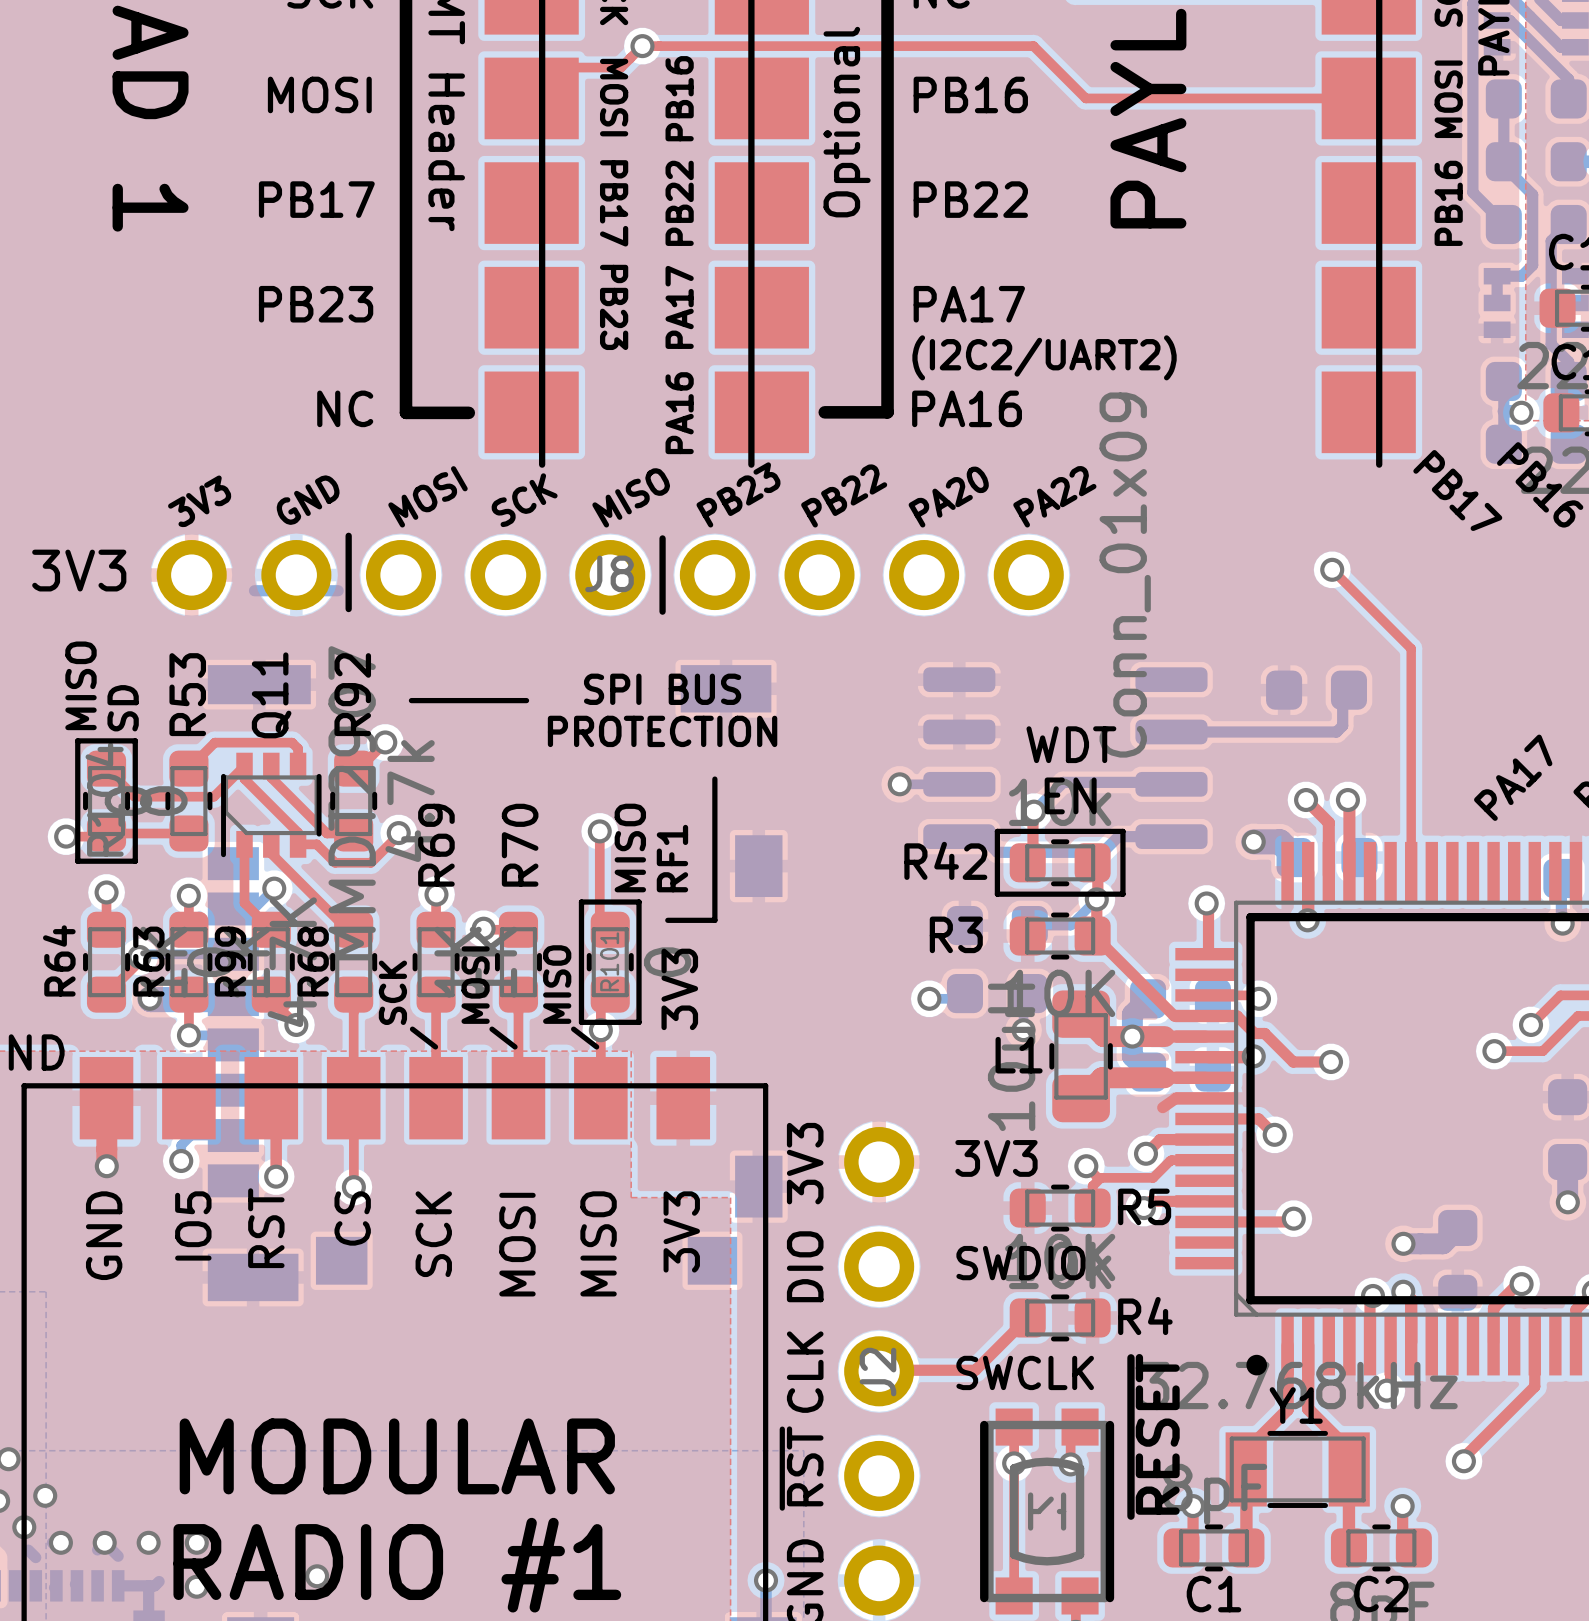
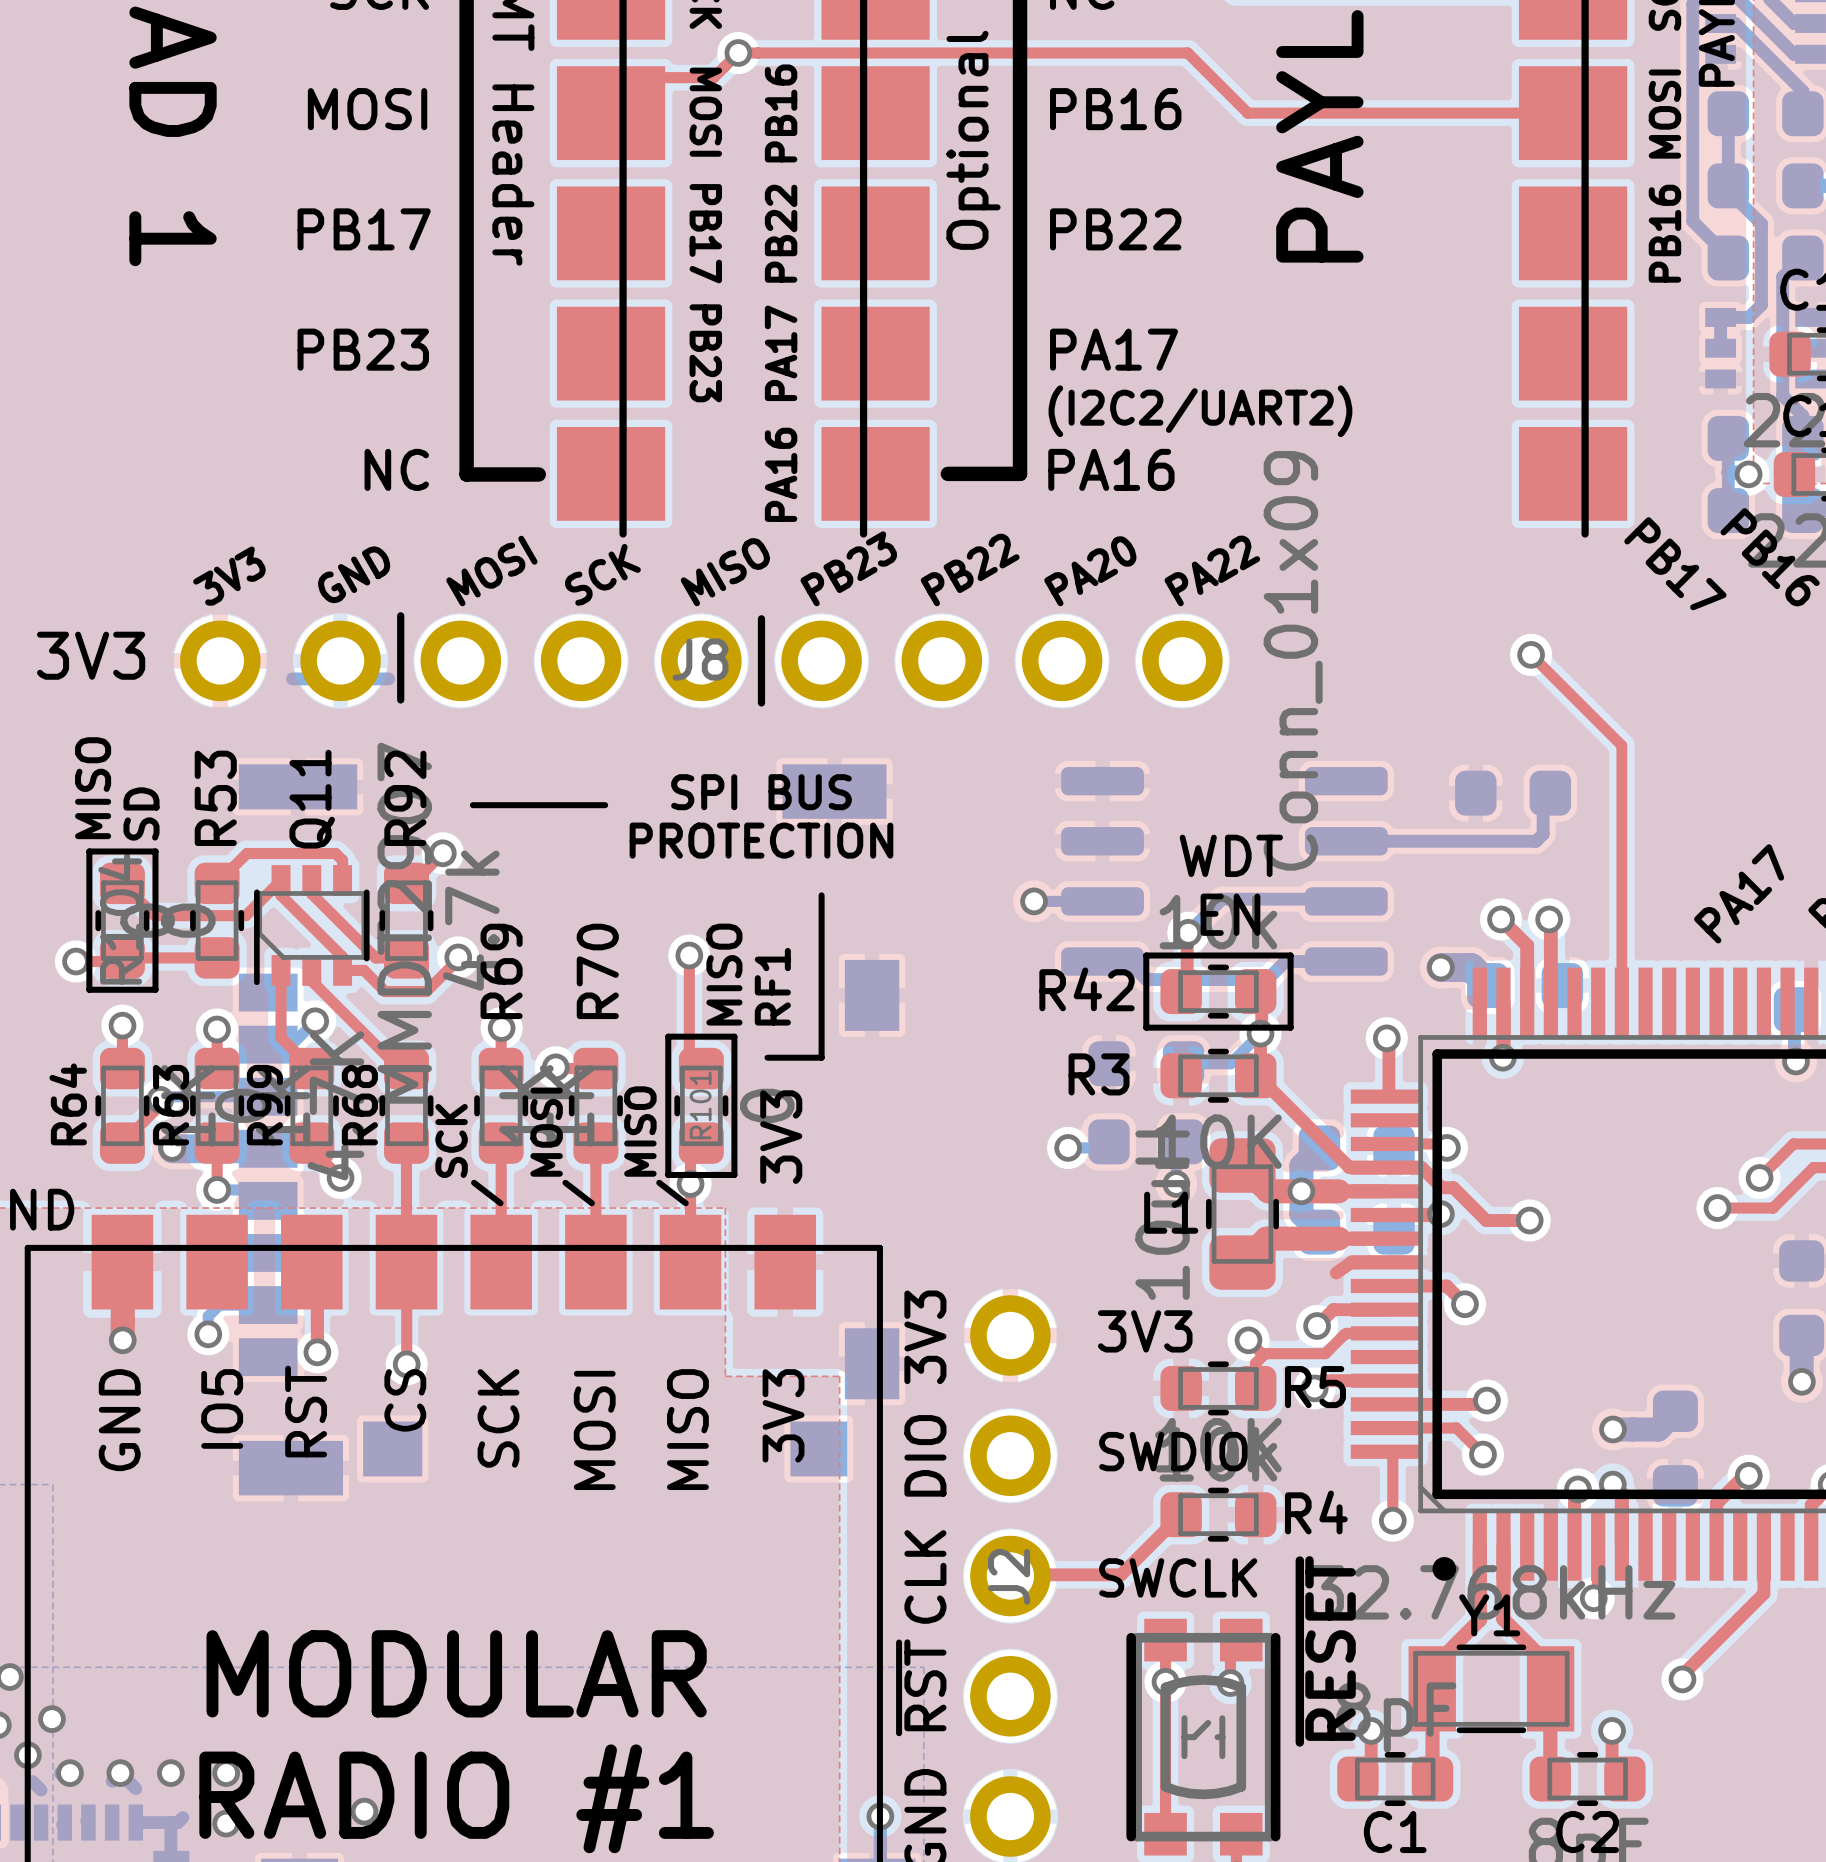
top track: none -> (1388, 1428) (1456, 1428) (1483, 1454)
top track: none -> (1388, 1451) (1392, 1455) (1392, 1520)
via: none -> (1483, 1454)
via: none -> (1392, 1520)

